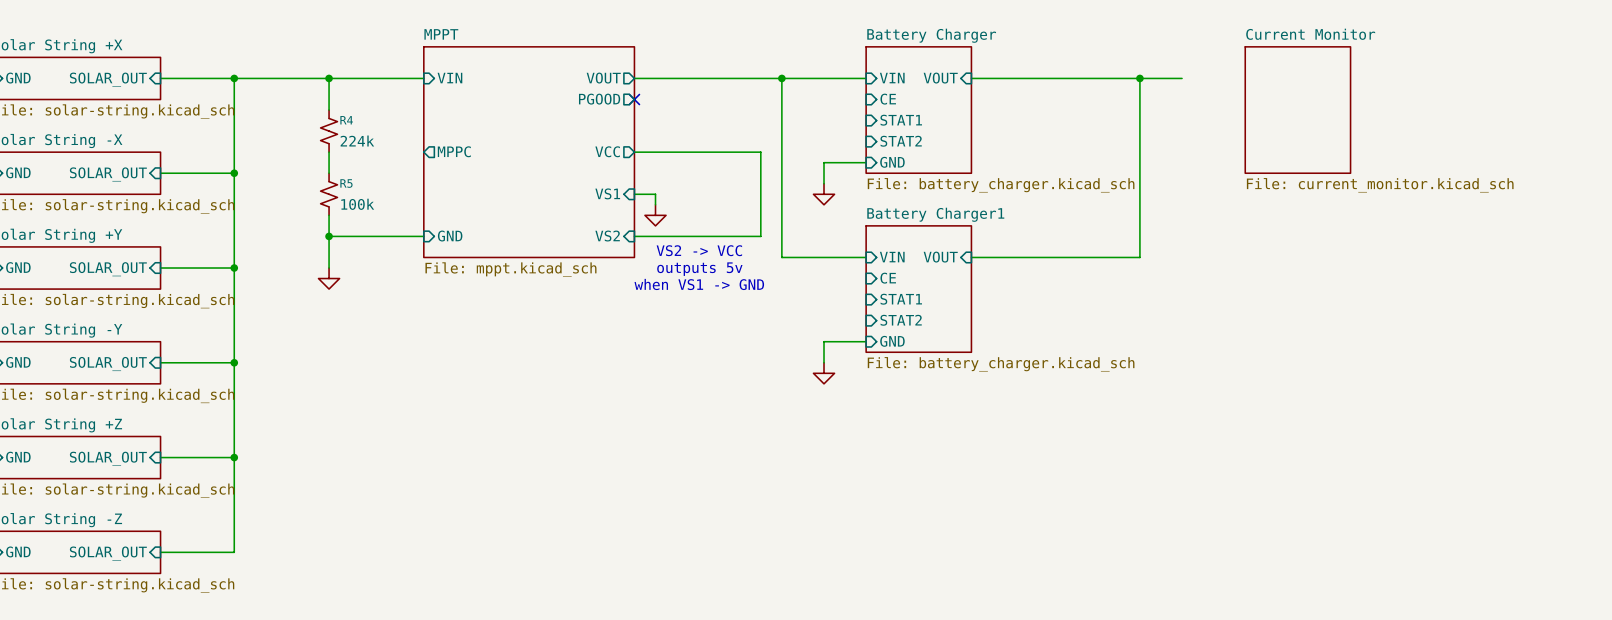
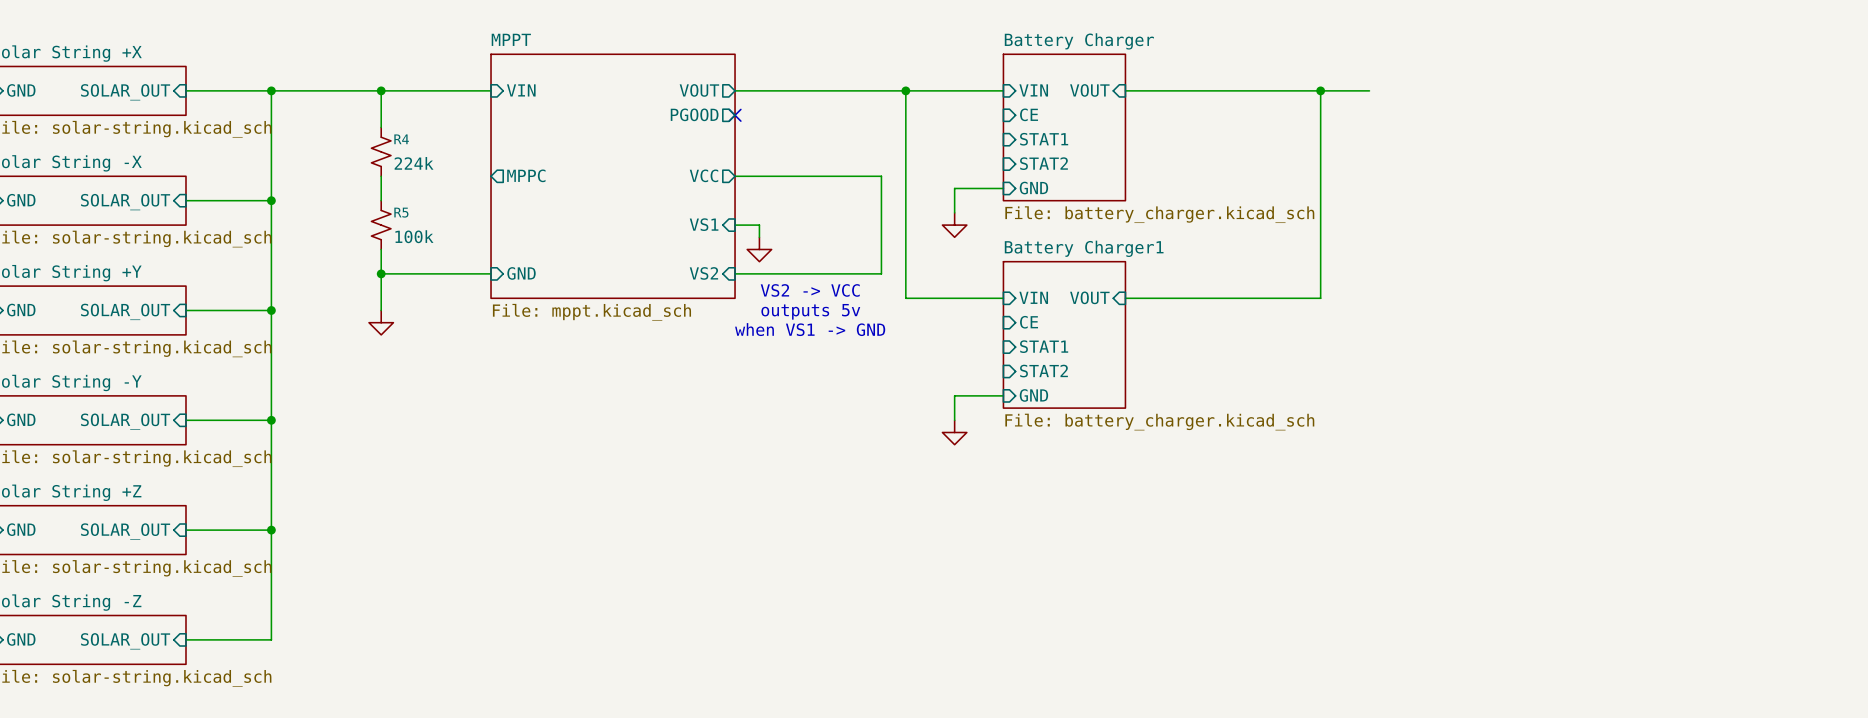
sheet Current Monitor: File: current_monitor.kicad_sch (1297, 110) -> none

